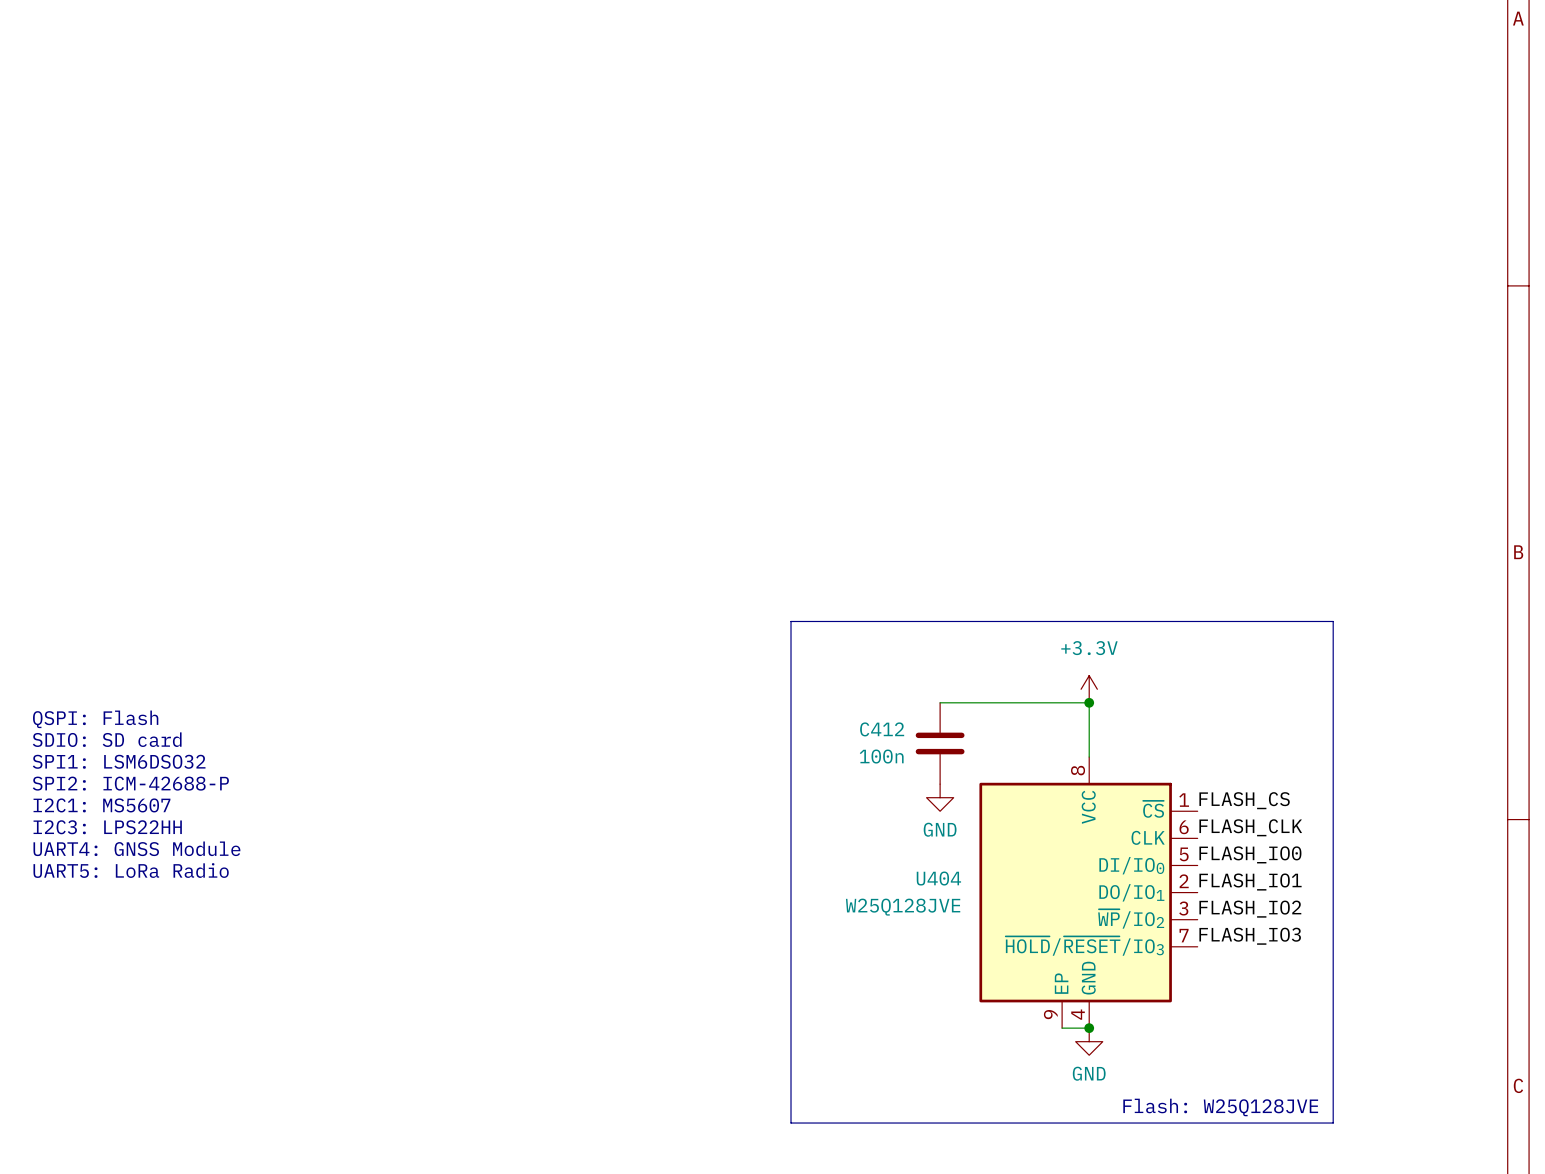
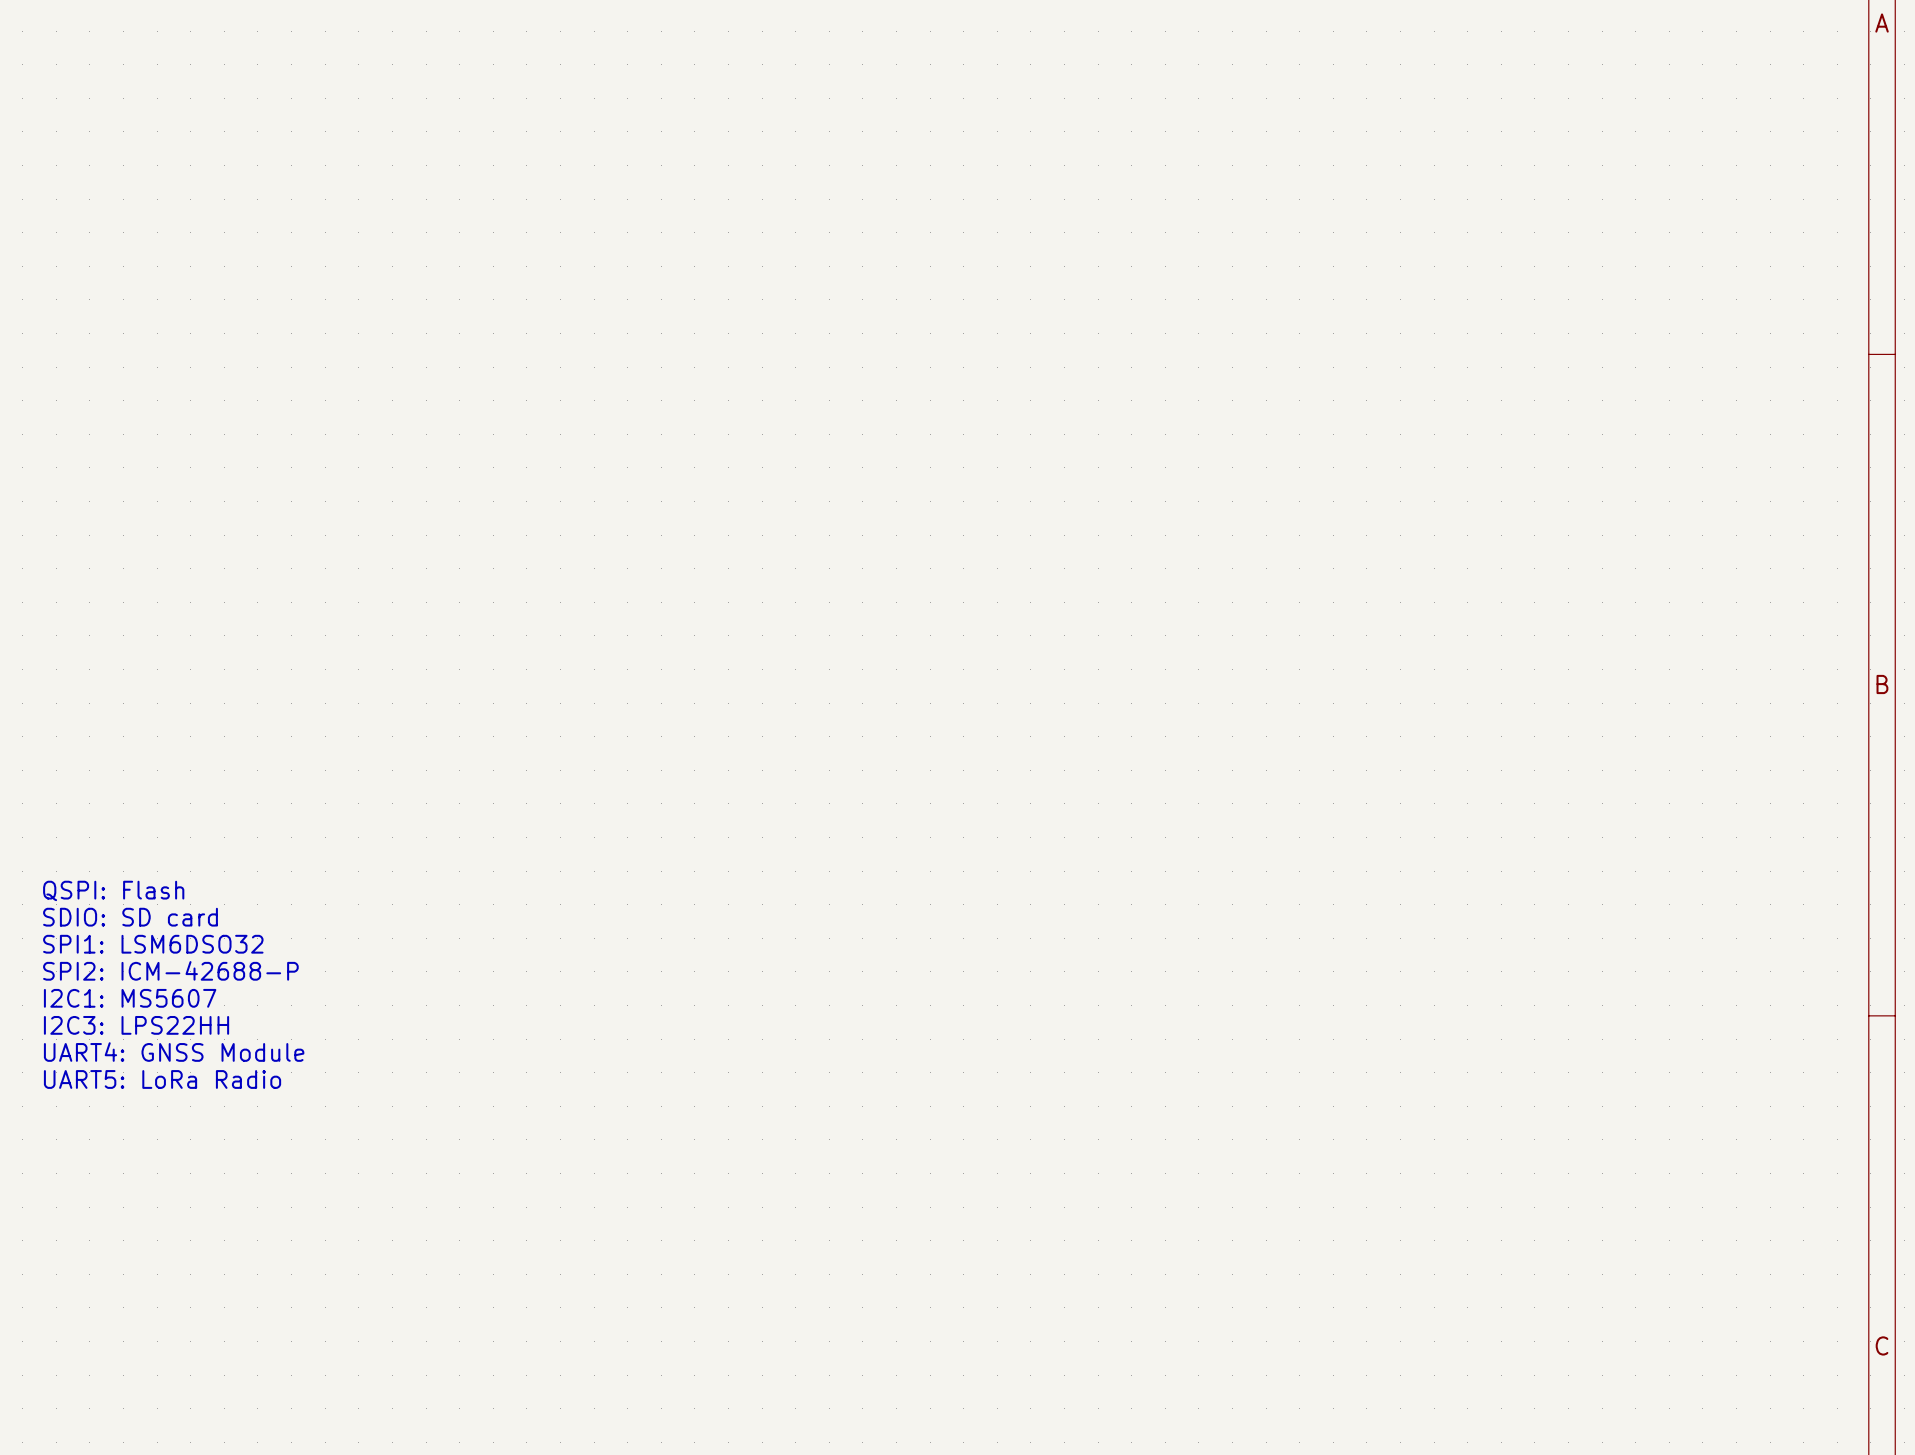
line: (791, 621) (1333, 621) (1333, 1123) (791, 1123) (791, 621) -> none
power symbol: +3.3V (1089, 689) -> none
wire: (940, 702) (1089, 702) (1089, 757) -> none
junction: (1089, 702) -> none
C412: 100n (940, 743) -> none
power symbol: GND (940, 797) -> none
label: FLASH_CS (1244, 800) -> none
label: FLASH_CLK (1250, 827) -> none
label: FLASH_IO0 (1250, 854) -> none
label: FLASH_IO1 (1250, 882) -> none
U404: W25Q128JVE (1088, 892) -> none
label: FLASH_IO2 (1250, 909) -> none
label: FLASH_IO3 (1250, 936) -> none
wire: (1062, 1028) (1089, 1028) -> none
junction: (1089, 1028) -> none
power symbol: GND (1089, 1041) -> none
text: Flash: W25Q128JVE (1220, 1107) -> none

